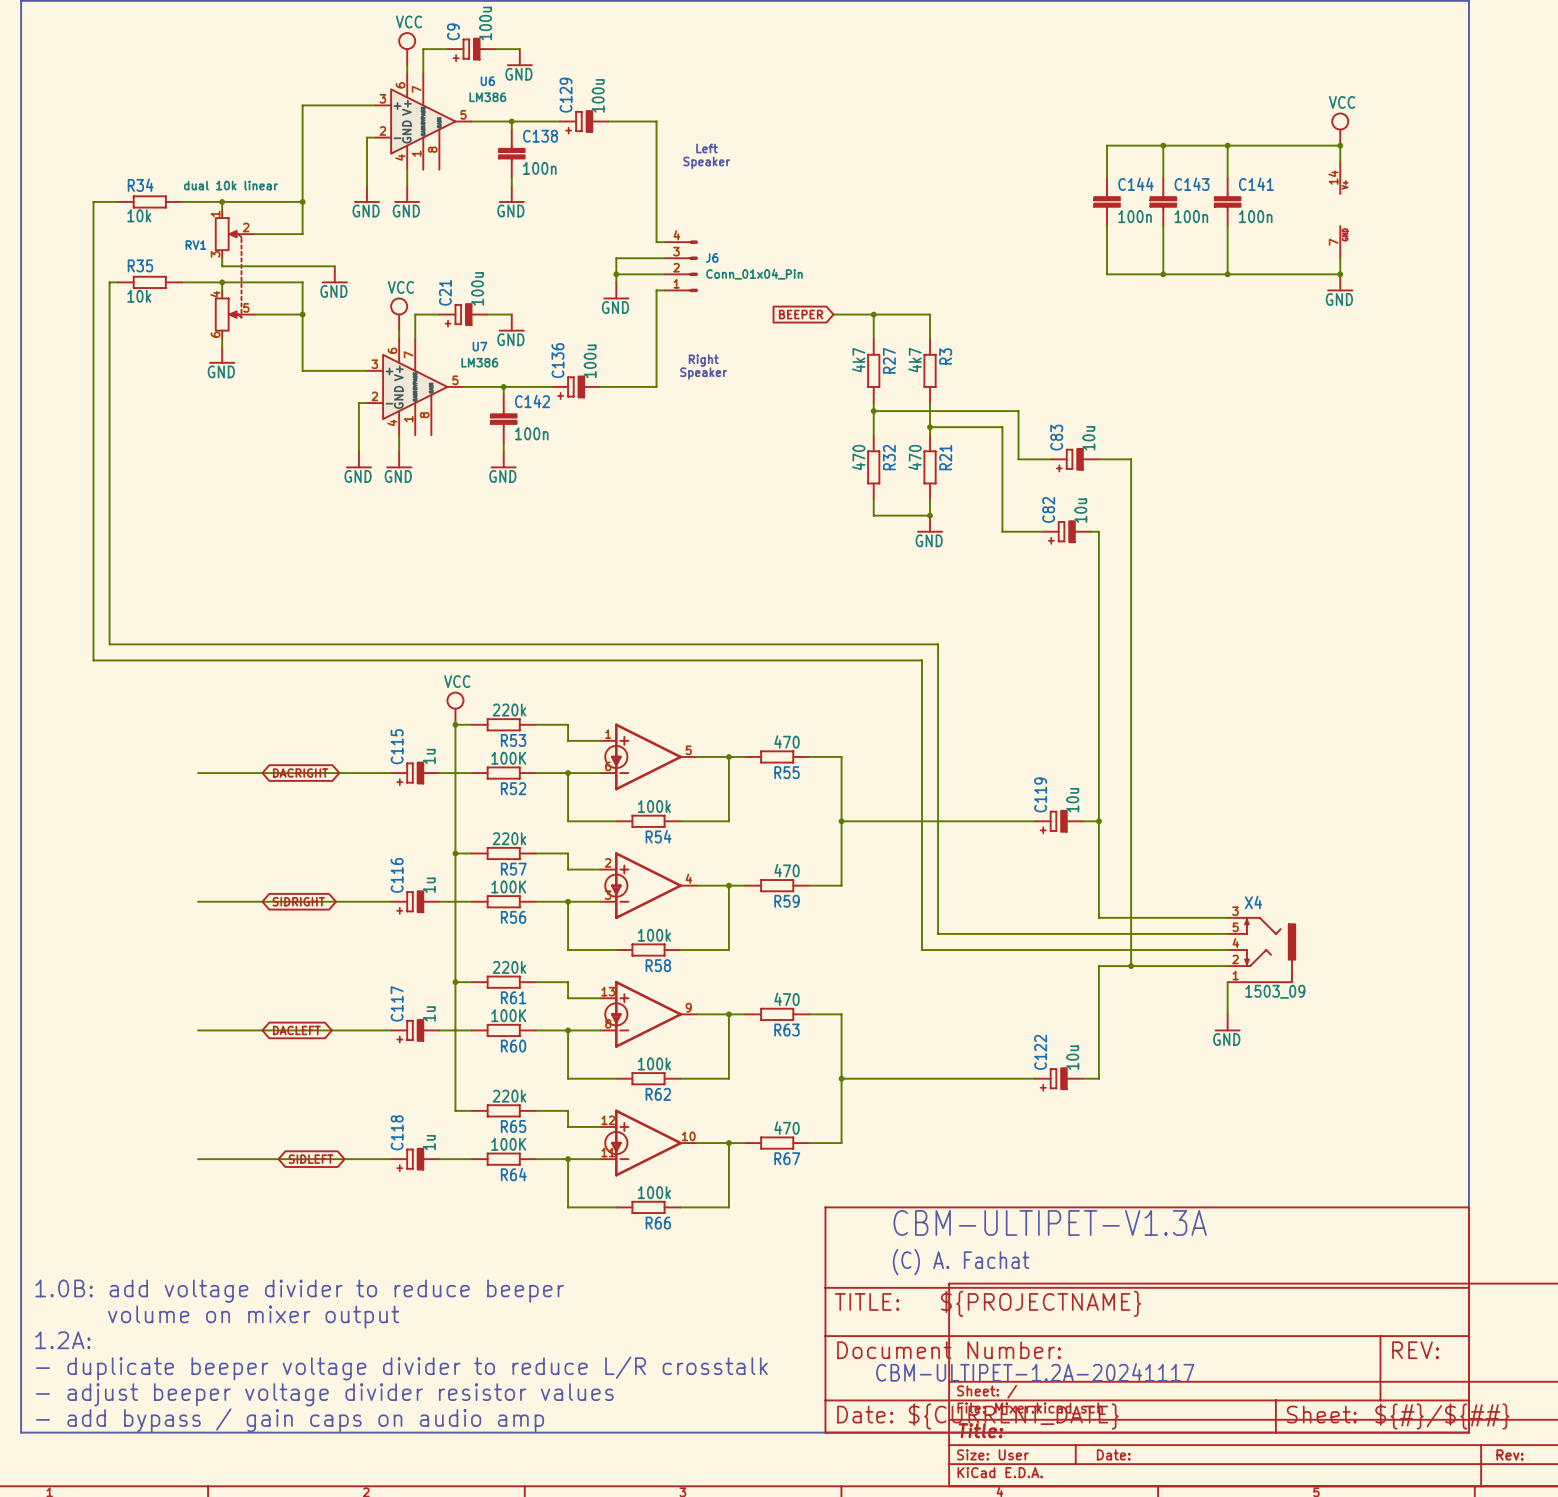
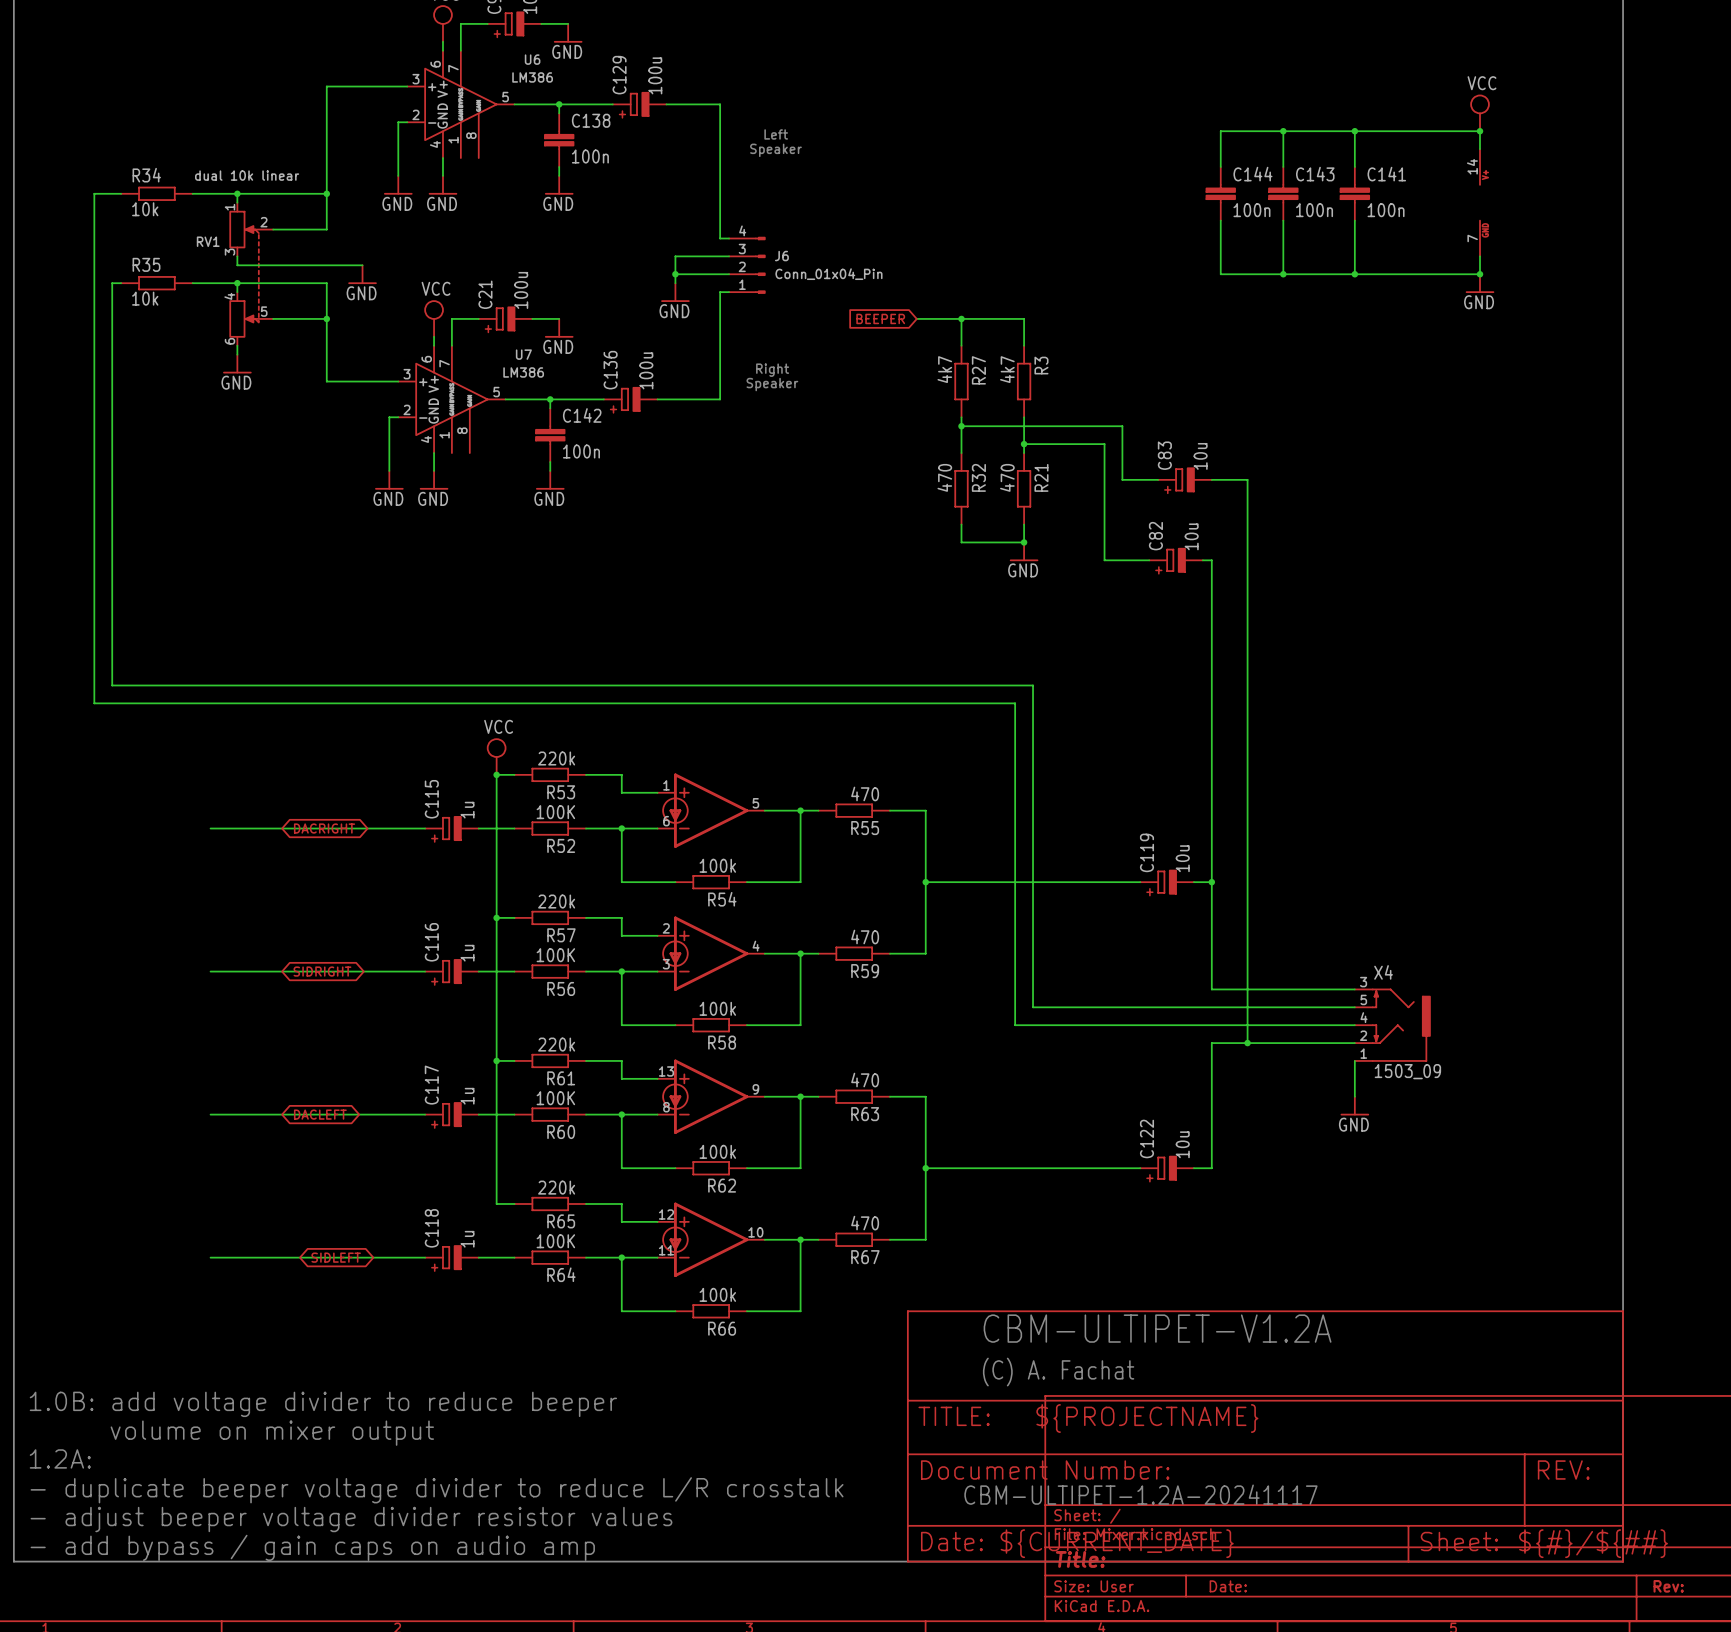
text: CBM-ULTIPET-V1.3A (1050, 1222) -> CBM-ULTIPET-V1.2A (1157, 1328)

